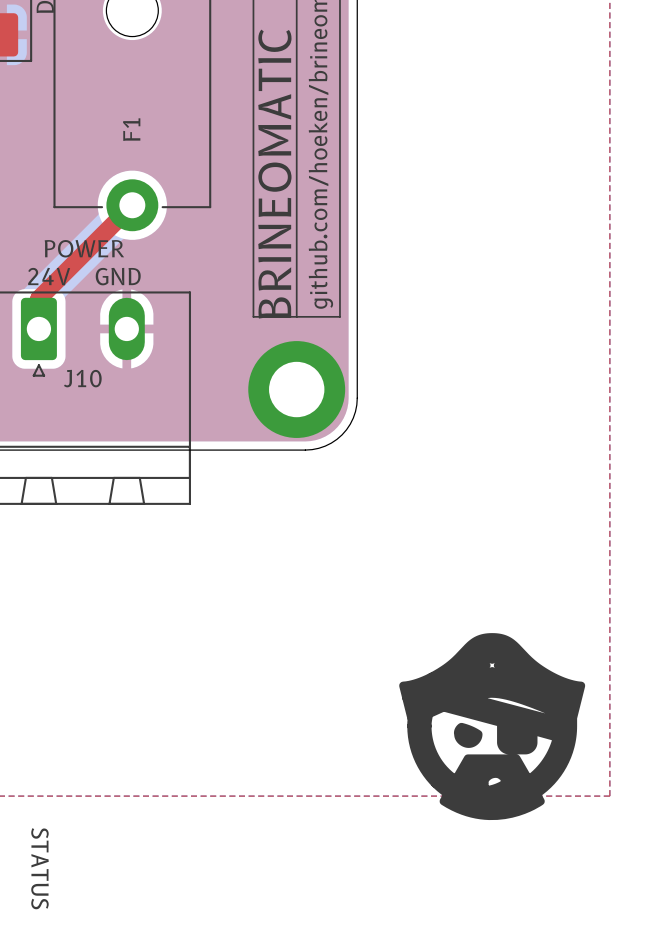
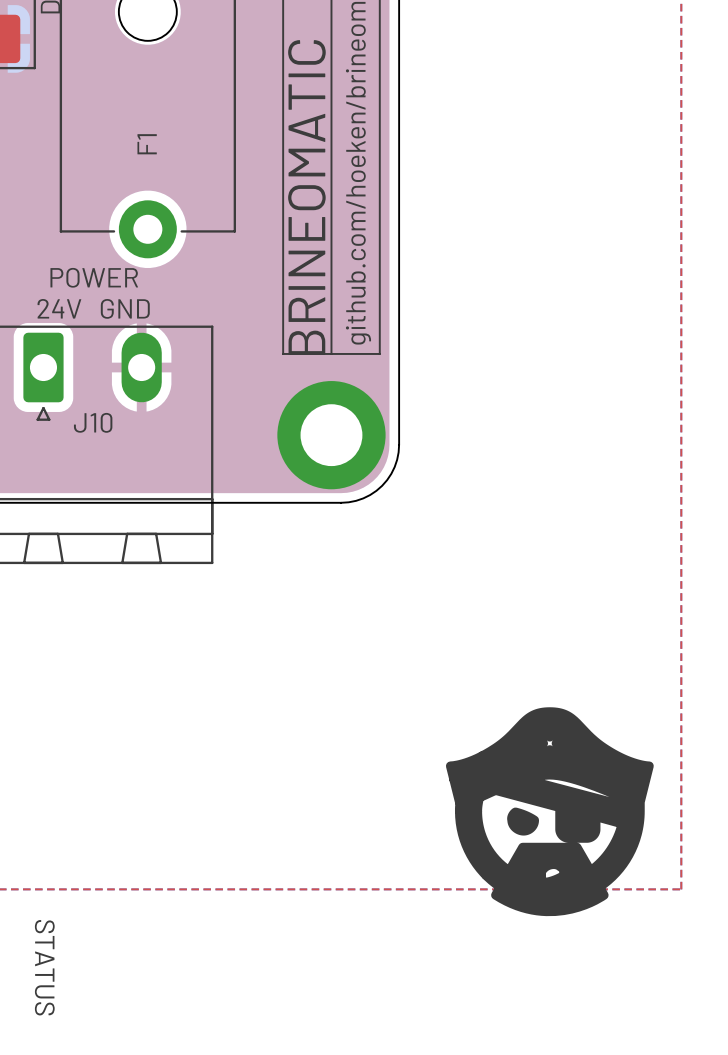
top track: (132, 205) (38, 298) (38, 328) -> none

